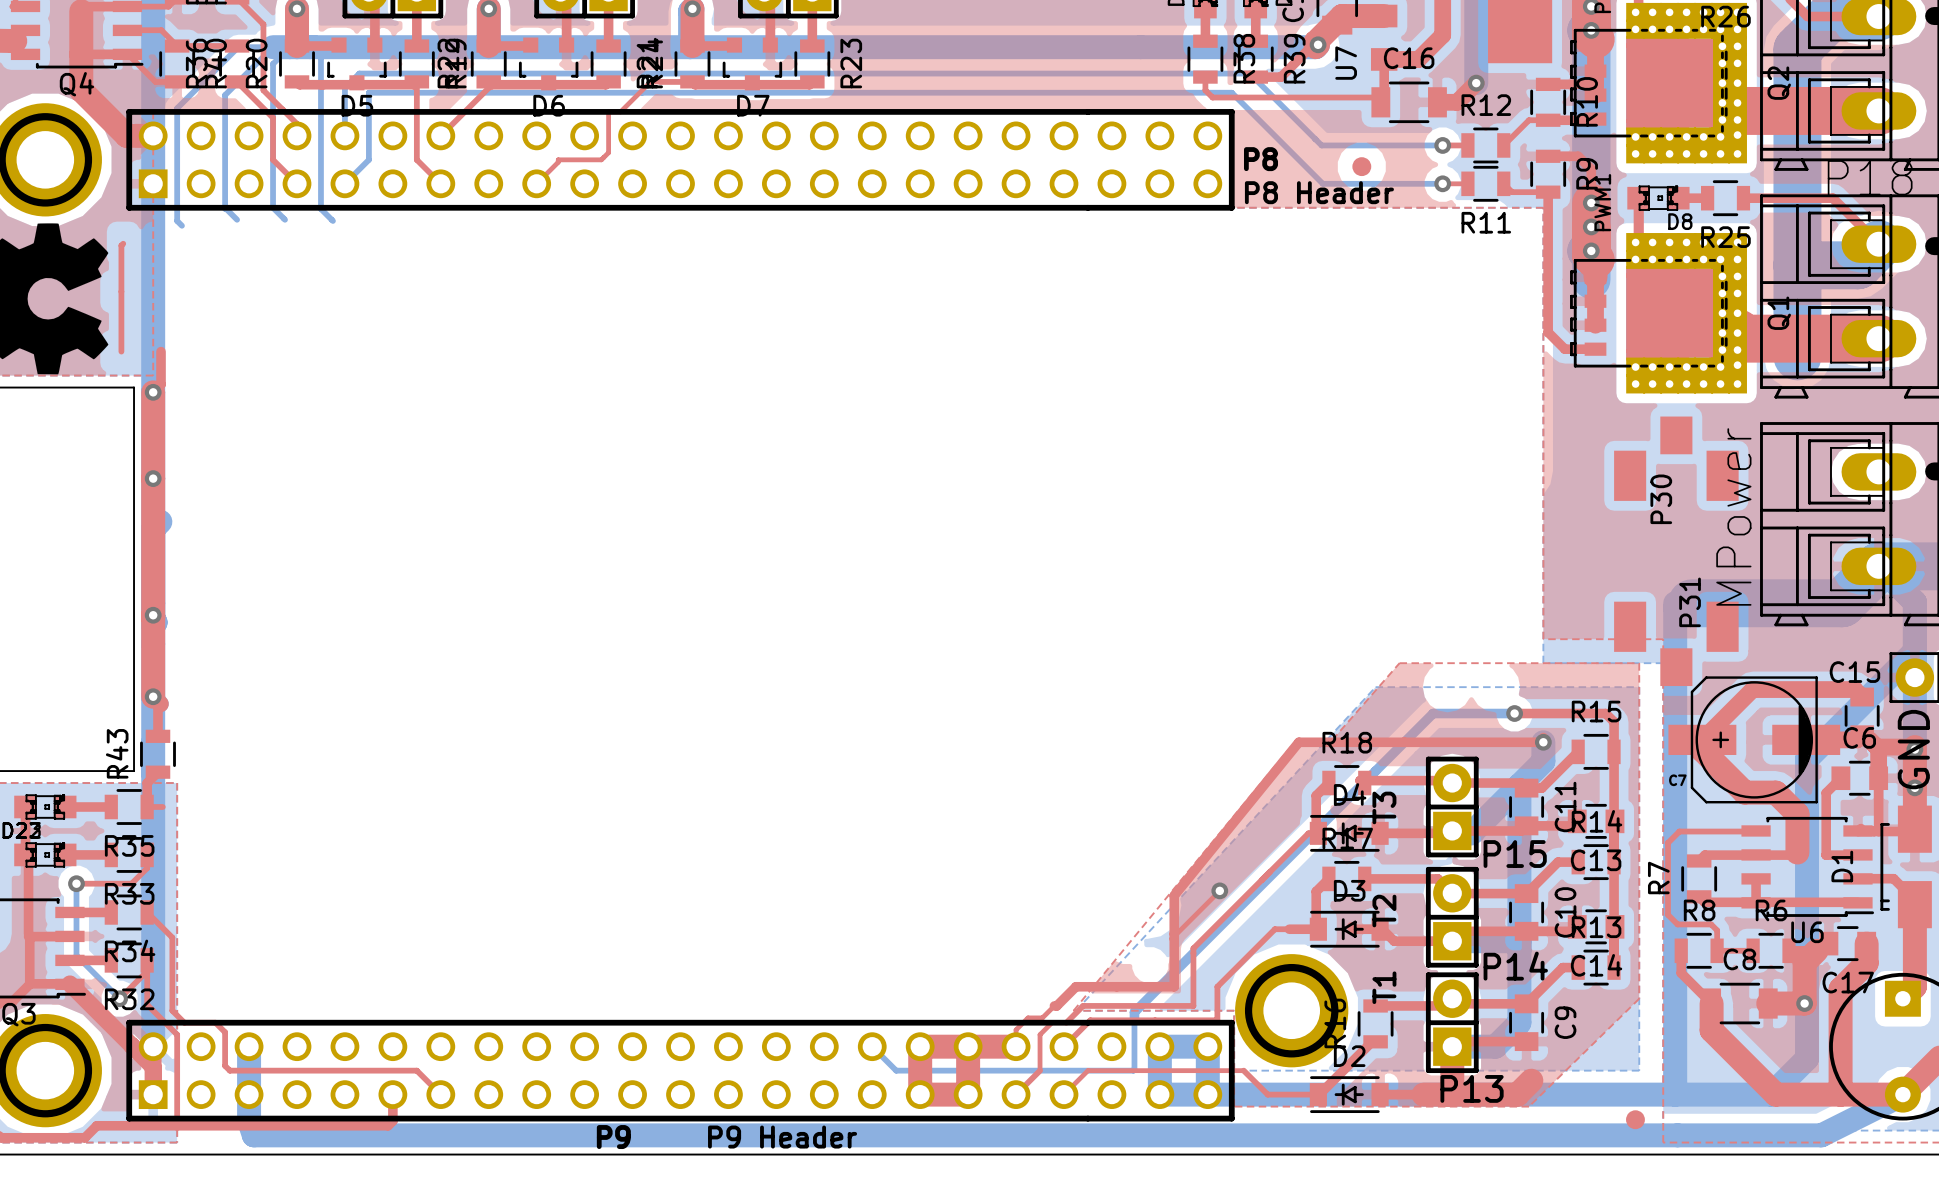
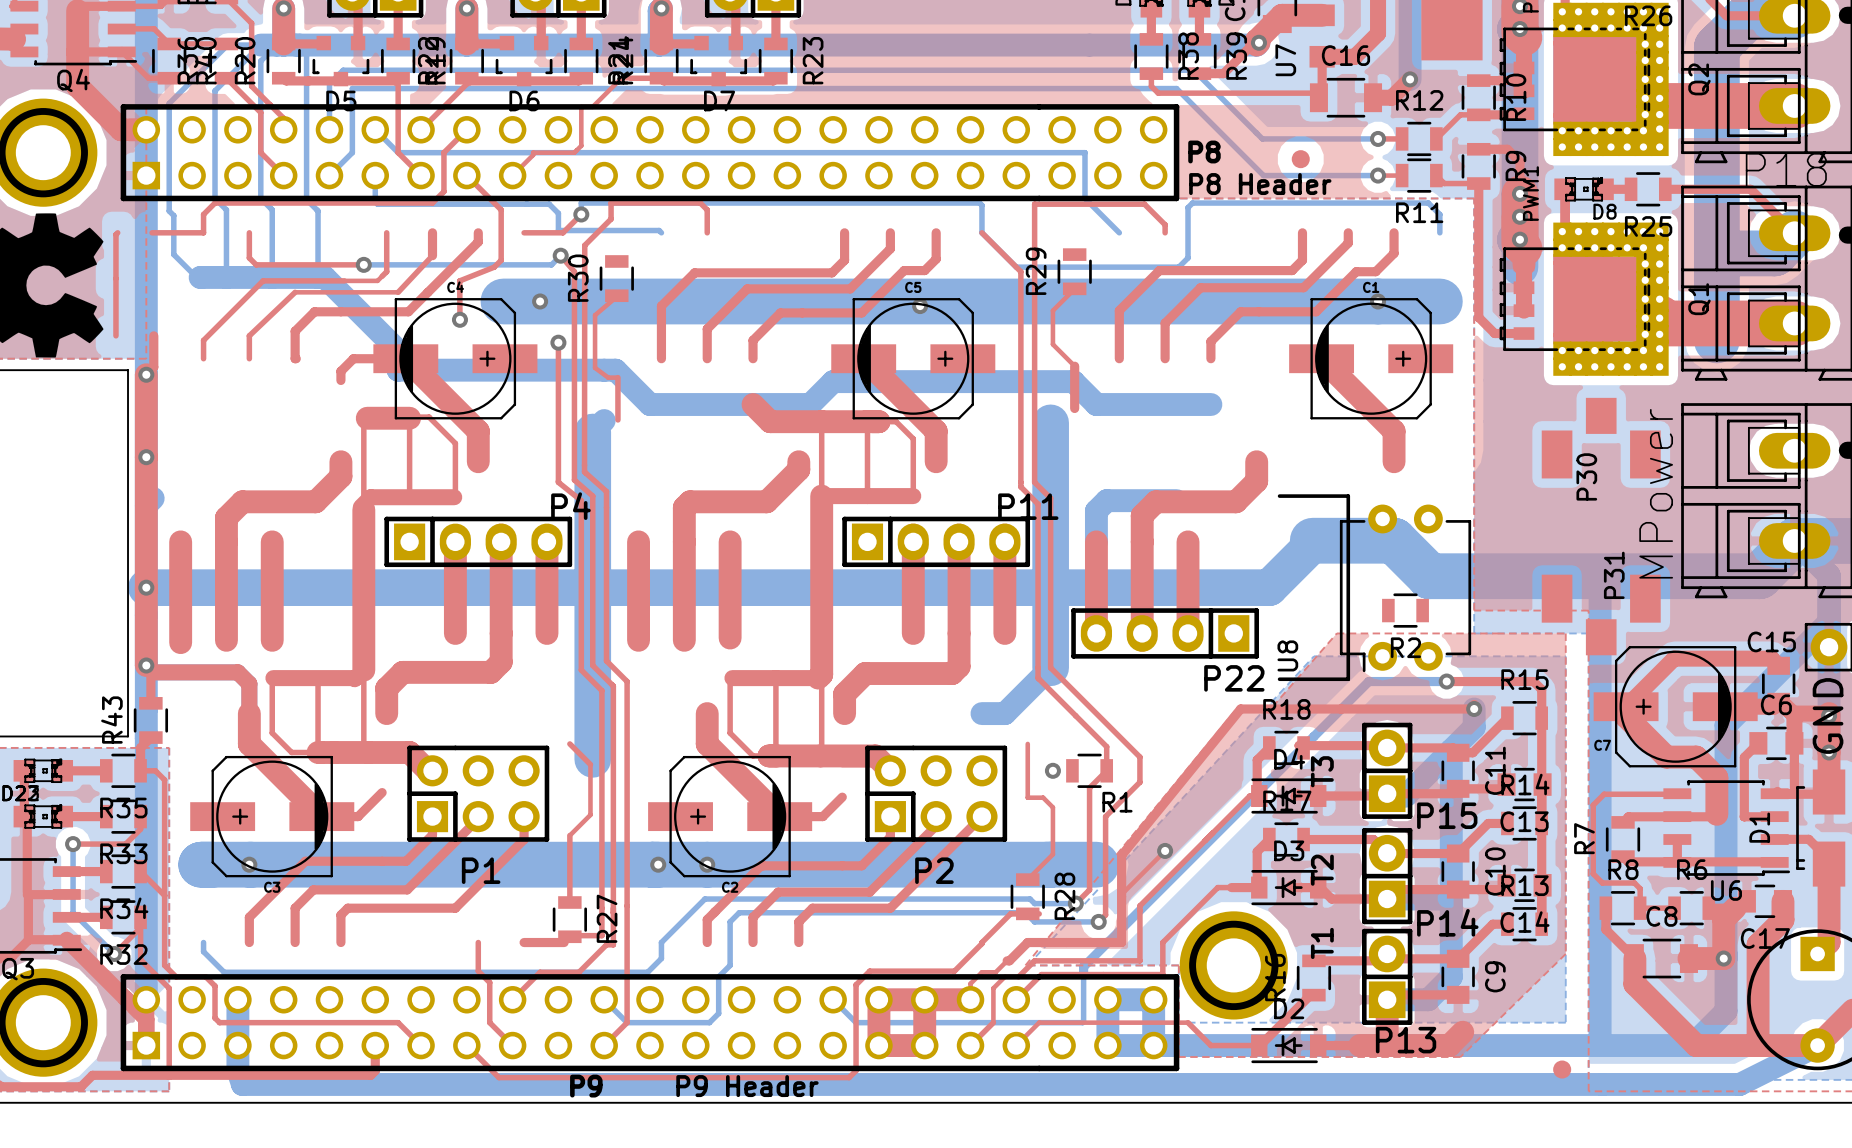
bottom track: none -> (375, 129) (398, 152) (1084, 152) (1084, 198) (1119, 232)
top track: none -> (466, 129) (443, 152) (443, 191) (432, 203) (215, 203) (203, 214) (203, 232) (152, 232)
bottom track: none -> (375, 175) (375, 201) (377, 204) (549, 204) (558, 213) (558, 230) (659, 230) (661, 232)
top track: none -> (466, 175) (501, 209) (501, 260) (494, 267) (459, 280) (459, 319)
bottom track: none -> (226, 209) (226, 277)
bottom track: none -> (272, 209) (272, 277)
bottom track: none -> (318, 211) (318, 277)
top track: none -> (581, 214) (563, 232) (524, 232)
bottom track: none -> (581, 214) (581, 203) (979, 203) (981, 205) (981, 232) (1016, 267) (1178, 267) (1188, 257) (1188, 207) (1192, 203) (1428, 203) (1439, 214) (1439, 232)
via: none -> (581, 214)
bottom track: none -> (173, 215) (173, 254) (196, 277) (201, 277)
top track: none -> (249, 232) (249, 257) (256, 264) (363, 264)
top track: none -> (386, 232) (386, 271) (377, 280) (263, 280) (203, 340) (203, 358)
top track: none -> (432, 232) (432, 255) (398, 292) (295, 292) (249, 335) (249, 358)
top track: none -> (707, 232) (707, 209) (700, 203) (611, 203) (611, 219) (584, 245) (584, 471) (606, 491) (606, 660) (627, 681) (627, 1022) (604, 1045)
top track: none -> (844, 232) (844, 260) (832, 272) (694, 272) (661, 306) (661, 358)
top track: none -> (890, 232) (890, 248) (850, 288) (747, 288) (707, 328) (707, 358)
top track: none -> (936, 232) (936, 259) (924, 270) (904, 270) (861, 312) (780, 312) (753, 340) (753, 358)
top track: none -> (981, 232) (1020, 271) (1020, 486) (1038, 504) (1038, 678) (1106, 746) (1106, 770) (1089, 787) (1089, 889) (1075, 903)
top track: none -> (1165, 232) (1165, 224) (1144, 204) (1034, 204) (1034, 482) (1050, 498) (1050, 667) (1139, 757) (1139, 782) (1105, 816) (1105, 915) (1098, 921)
top track: none -> (1302, 232) (1302, 260) (1292, 270) (1159, 270) (1119, 310) (1119, 358)
top track: none -> (1348, 232) (1348, 243) (1303, 287) (1200, 287) (1165, 323) (1165, 358)
top track: none -> (1394, 232) (1394, 253) (1375, 271) (1356, 271) (1316, 311) (1240, 311) (1210, 341) (1210, 358)
top track: none -> (478, 237) (478, 232) (478, 241) (408, 311) (314, 311) (295, 331) (296, 358)
top track: none -> (560, 255) (574, 271) (574, 480) (592, 496) (592, 665) (613, 686) (613, 944) (606, 944) (579, 972) (540, 972) (512, 999)
bottom track: none -> (560, 255) (551, 264) (363, 264)
via: none -> (560, 255)
via: none -> (363, 264)
R29: none -> (1074, 271)
bottom track: none -> (200, 277) (324, 277) (398, 350) (398, 370) (615, 370) (649, 404) (810, 404) (833, 381) (1073, 381) (1096, 404) (1210, 404)
R30: none -> (616, 278)
top track: none -> (1074, 288) (1052, 310) (1052, 344) (1074, 366) (1074, 408)
top track: none -> (617, 295) (595, 315) (595, 367) (608, 377) (617, 377) (617, 419)
bottom track: none -> (503, 301) (1439, 301)
via: none -> (540, 301)
via: none -> (1378, 301)
via: none -> (920, 306)
via: none -> (459, 319)
top track: none -> (558, 342) (558, 482) (581, 500) (581, 670) (601, 690) (601, 935) (571, 935) (564, 942) (524, 942)
via: none -> (558, 342)
C4: none -> (455, 358)
C5: none -> (913, 358)
C1: none -> (1371, 358)
top track: none -> (863, 375) (863, 358) (936, 431) (936, 461)
top track: none -> (1321, 375) (1321, 358) (1394, 431) (1394, 461)
top track: none -> (340, 380) (340, 371) (353, 358) (405, 358) (478, 431) (478, 461)
top track: none -> (802, 415) (764, 415) (753, 404) (770, 421) (896, 421) (913, 438) (913, 496) (821, 496) (821, 674) (818, 678)
top track: none -> (389, 418) (429, 417) (455, 443) (455, 496) (370, 497) (360, 506)
bottom track: none -> (604, 420) (592, 431) (592, 759)
bottom track: none -> (1048, 420) (1050, 422) (1050, 667) (1004, 713) (981, 713)
top track: none -> (821, 421) (821, 525)
top track: none -> (866, 421) (867, 496)
top track: none -> (340, 461) (340, 476) (315, 501) (242, 501) (226, 517) (226, 640)
top track: none -> (798, 461) (798, 469) (766, 501) (690, 501) (684, 507) (684, 640)
top track: none -> (1256, 461) (1256, 481) (1236, 501) (1155, 501) (1142, 515) (1142, 640)
line: none -> (1279, 496) (1348, 496) (1348, 679) (1279, 679)
top track: none -> (409, 498) (409, 418) (367, 418) (363, 421) (363, 514)
bottom track: none -> (1176, 500) (1106, 500) (1096, 510) (1096, 541)
top track: none -> (363, 509) (363, 670)
top track: none -> (501, 535) (501, 662) (490, 672) (402, 672) (386, 688) (386, 713)
top track: none -> (913, 535) (913, 633)
top track: none -> (959, 535) (959, 666) (952, 673) (865, 673) (844, 694) (844, 713)
top track: none -> (1004, 535) (1004, 633)
top track: none -> (272, 537) (272, 640)
top track: none -> (455, 537) (455, 633)
top track: none -> (546, 537) (546, 633)
bottom track: none -> (1312, 540) (1394, 540) (1429, 576) (1616, 576)
bottom track: none -> (1316, 540) (1269, 587) (146, 587)
top track: none -> (180, 541) (180, 642)
P4: none -> (478, 541)
top track: none -> (638, 541) (638, 640)
top track: none -> (730, 541) (730, 638)
P11: none -> (936, 541)
top track: none -> (1096, 541) (1096, 638)
top track: none -> (1188, 541) (1188, 640)
U8: none -> (1405, 588)
R2: none -> (1405, 610)
P22: none -> (1165, 633)
top track: none -> (821, 655) (820, 755)
top track: none -> (363, 670) (363, 747) (368, 752)
top track: none -> (153, 672) (237, 672) (249, 683) (249, 744) (321, 816) (358, 816) (382, 792)
top track: none -> (821, 676) (732, 678) (730, 680) (730, 733) (753, 755) (875, 755) (890, 770) (882, 762) (842, 762)
top track: none -> (355, 678) (272, 679) (272, 733) (291, 752) (334, 752)
top track: none -> (775, 678) (777, 755)
top track: none -> (318, 679) (318, 750) (320, 752)
top track: none -> (707, 713) (707, 744) (779, 816) (822, 816) (842, 797)
top track: none -> (569, 743) (590, 764) (590, 814) (569, 835) (569, 902)
top track: none -> (1027, 743) (1027, 797) (1043, 797) (1052, 807) (1052, 854) (1027, 879)
top track: none -> (318, 752) (409, 752) (427, 770) (432, 770) (419, 758) (382, 758)
top track: none -> (155, 770) (164, 779) (164, 895)
via: none -> (1052, 770)
R1: none -> (1089, 770)
P1: none -> (478, 793)
P2: none -> (936, 793)
top track: none -> (431, 815) (432, 834) (406, 861) (305, 861) (249, 917) (249, 942)
C3: none -> (272, 816)
top track: none -> (478, 816) (478, 818) (407, 889) (313, 889) (295, 908) (295, 942)
top track: none -> (524, 816) (524, 839) (455, 908) (347, 908) (340, 915) (340, 942)
C2: none -> (730, 816)
top track: none -> (936, 816) (936, 825) (869, 892) (778, 892) (753, 917) (753, 942) (753, 931)
top track: none -> (981, 816) (890, 908) (812, 908) (798, 921) (798, 942)
top track: none -> (883, 823) (890, 816) (890, 837) (861, 865) (761, 865) (707, 919) (707, 942) (707, 926)
bottom track: none -> (201, 864) (1096, 864)
via: none -> (249, 864)
via: none -> (658, 864)
via: none -> (707, 864)
R28: none -> (1027, 896)
bottom track: none -> (1075, 903) (1034, 903) (1030, 899) (704, 899) (661, 942) (661, 958) (647, 972) (224, 972) (203, 951) (203, 942)
via: none -> (1075, 903)
top track: none -> (1039, 913) (1010, 913) (954, 971) (869, 971) (856, 984) (856, 1070) (849, 1077) (498, 1077) (466, 1045)
R27: none -> (569, 919)
bottom track: none -> (1098, 921) (1034, 921) (1025, 912) (739, 912) (730, 921) (730, 965) (718, 976) (718, 1013) (709, 1022) (627, 1022) (604, 999)
via: none -> (1098, 921)
top track: none -> (478, 942) (478, 971) (489, 982) (489, 1022) (512, 1045)

